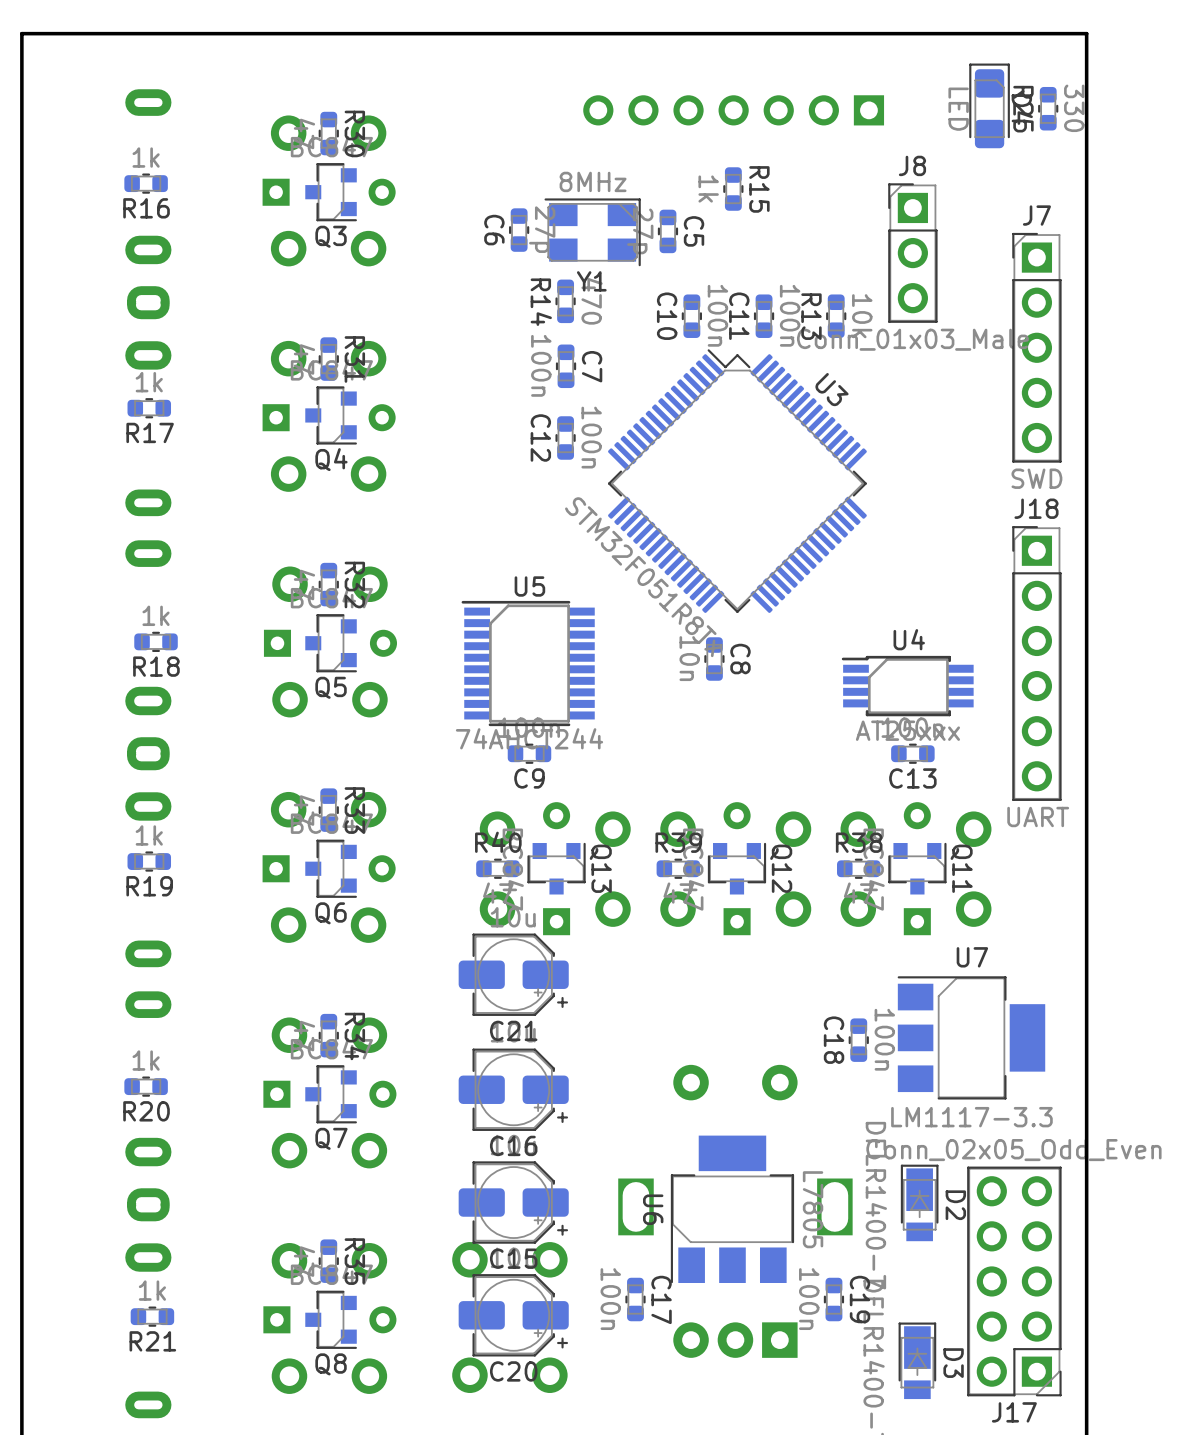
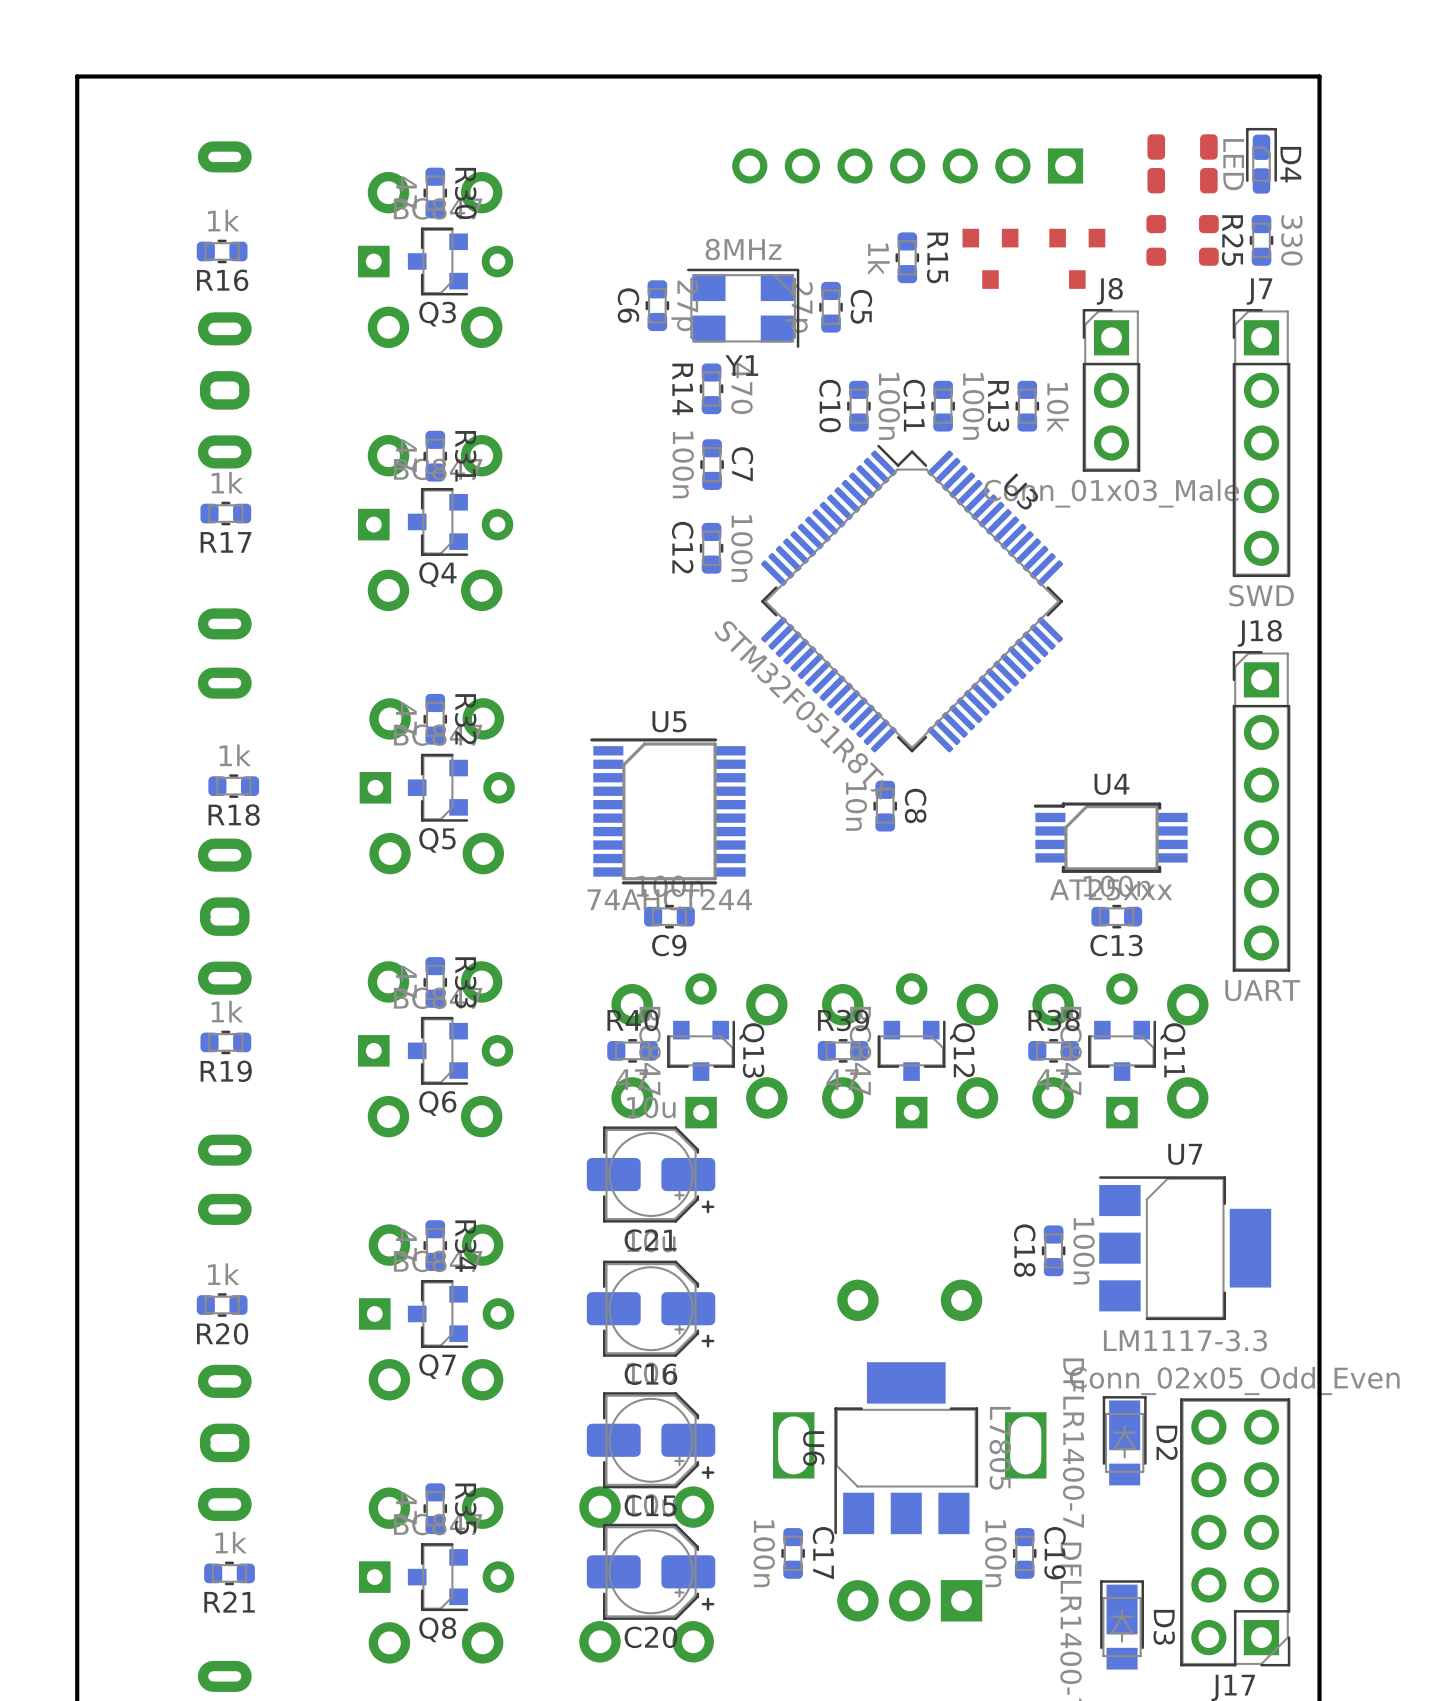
D4 footprint: [969, 63, 1010, 149] -> [1246, 127, 1277, 194]
part: none -> (1156, 163)
part: none -> (1208, 163)
R25 position: (1048, 108) -> (1261, 240)
part: none -> (1156, 240)
part: none -> (1208, 240)
part: none -> (990, 258)
part: none -> (1077, 258)
J8 position: (912, 253) -> (1111, 390)

